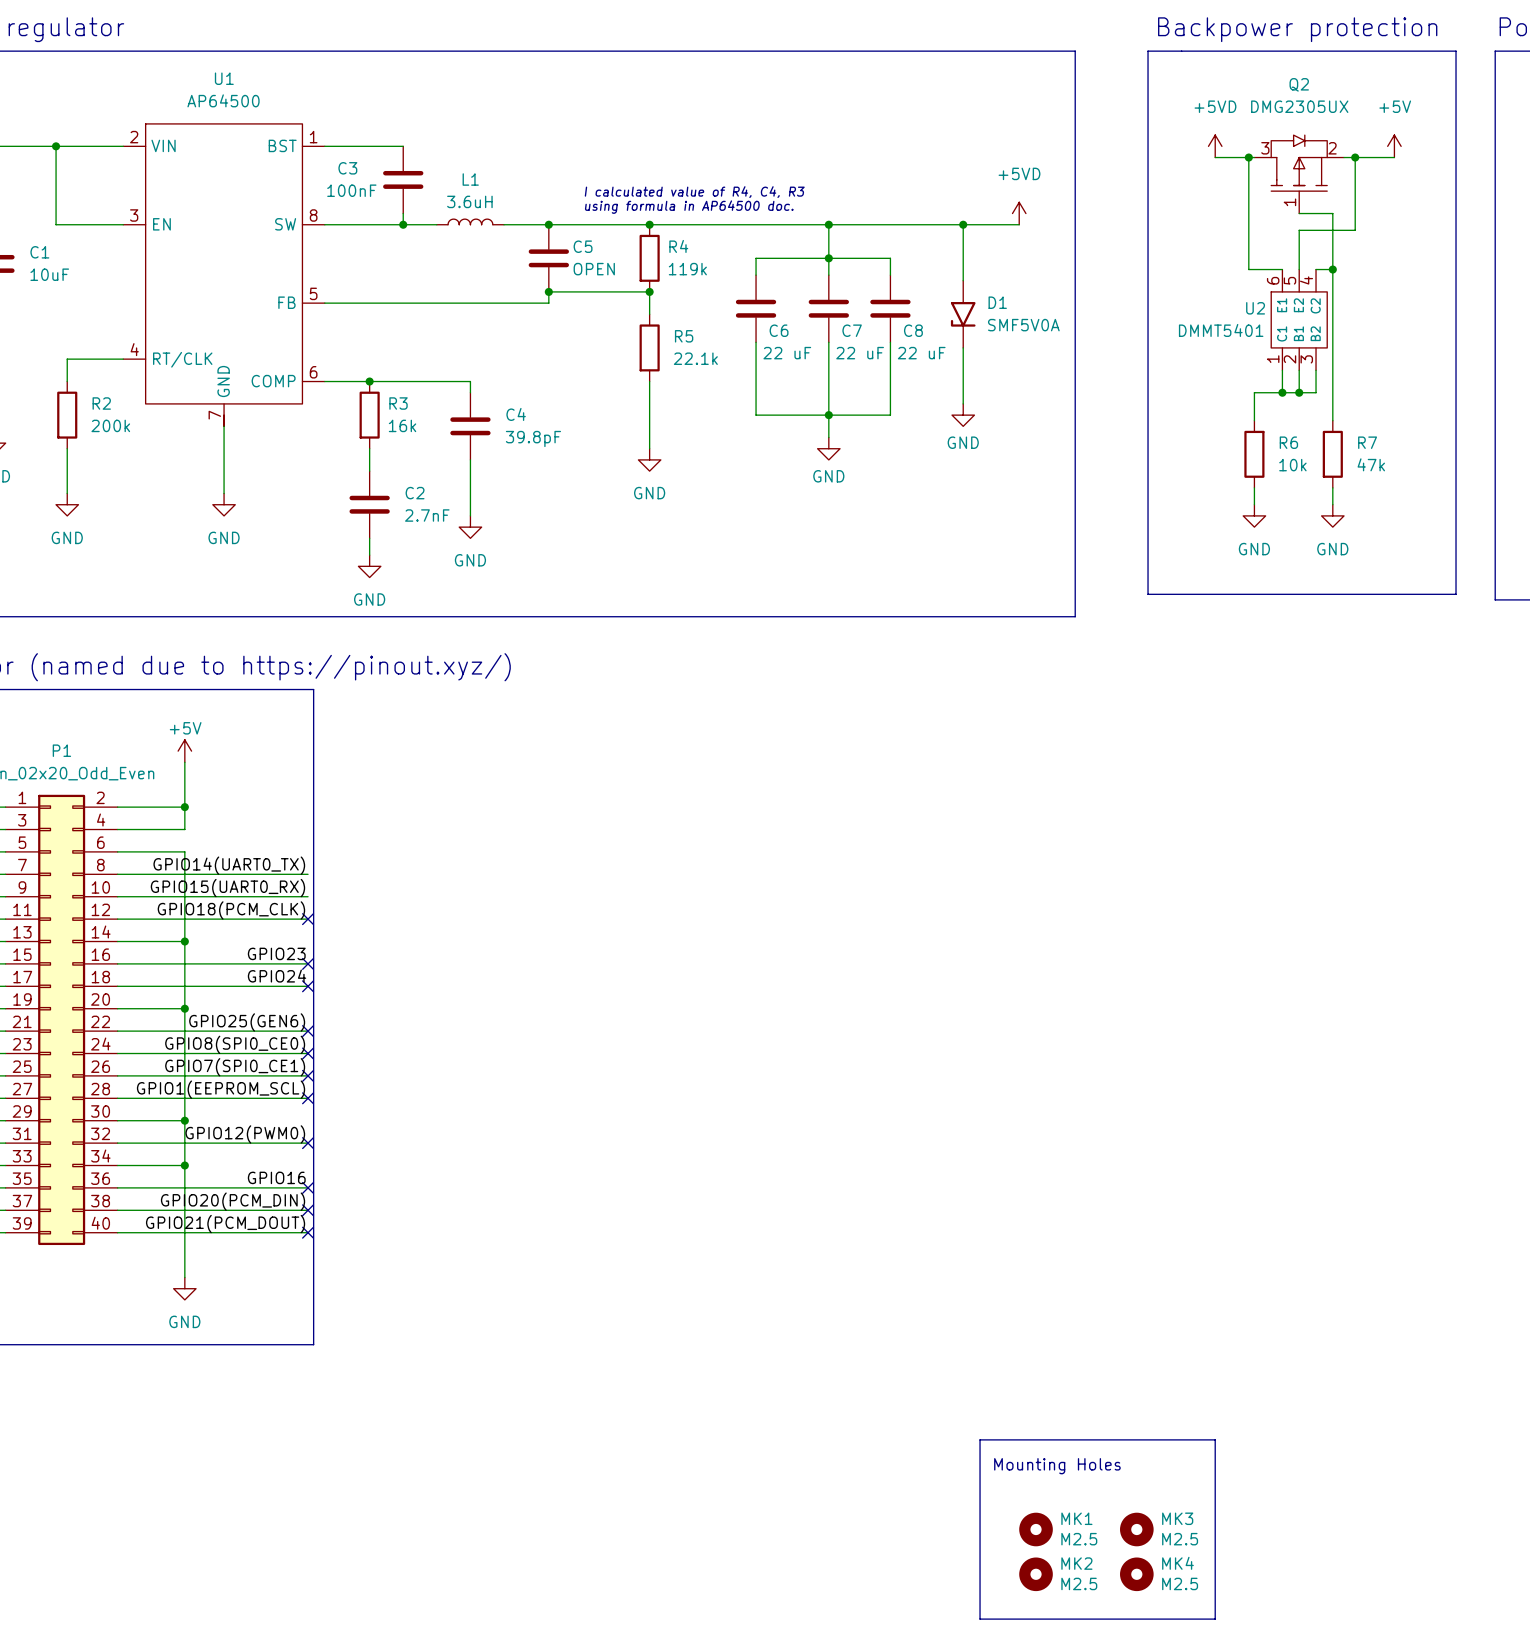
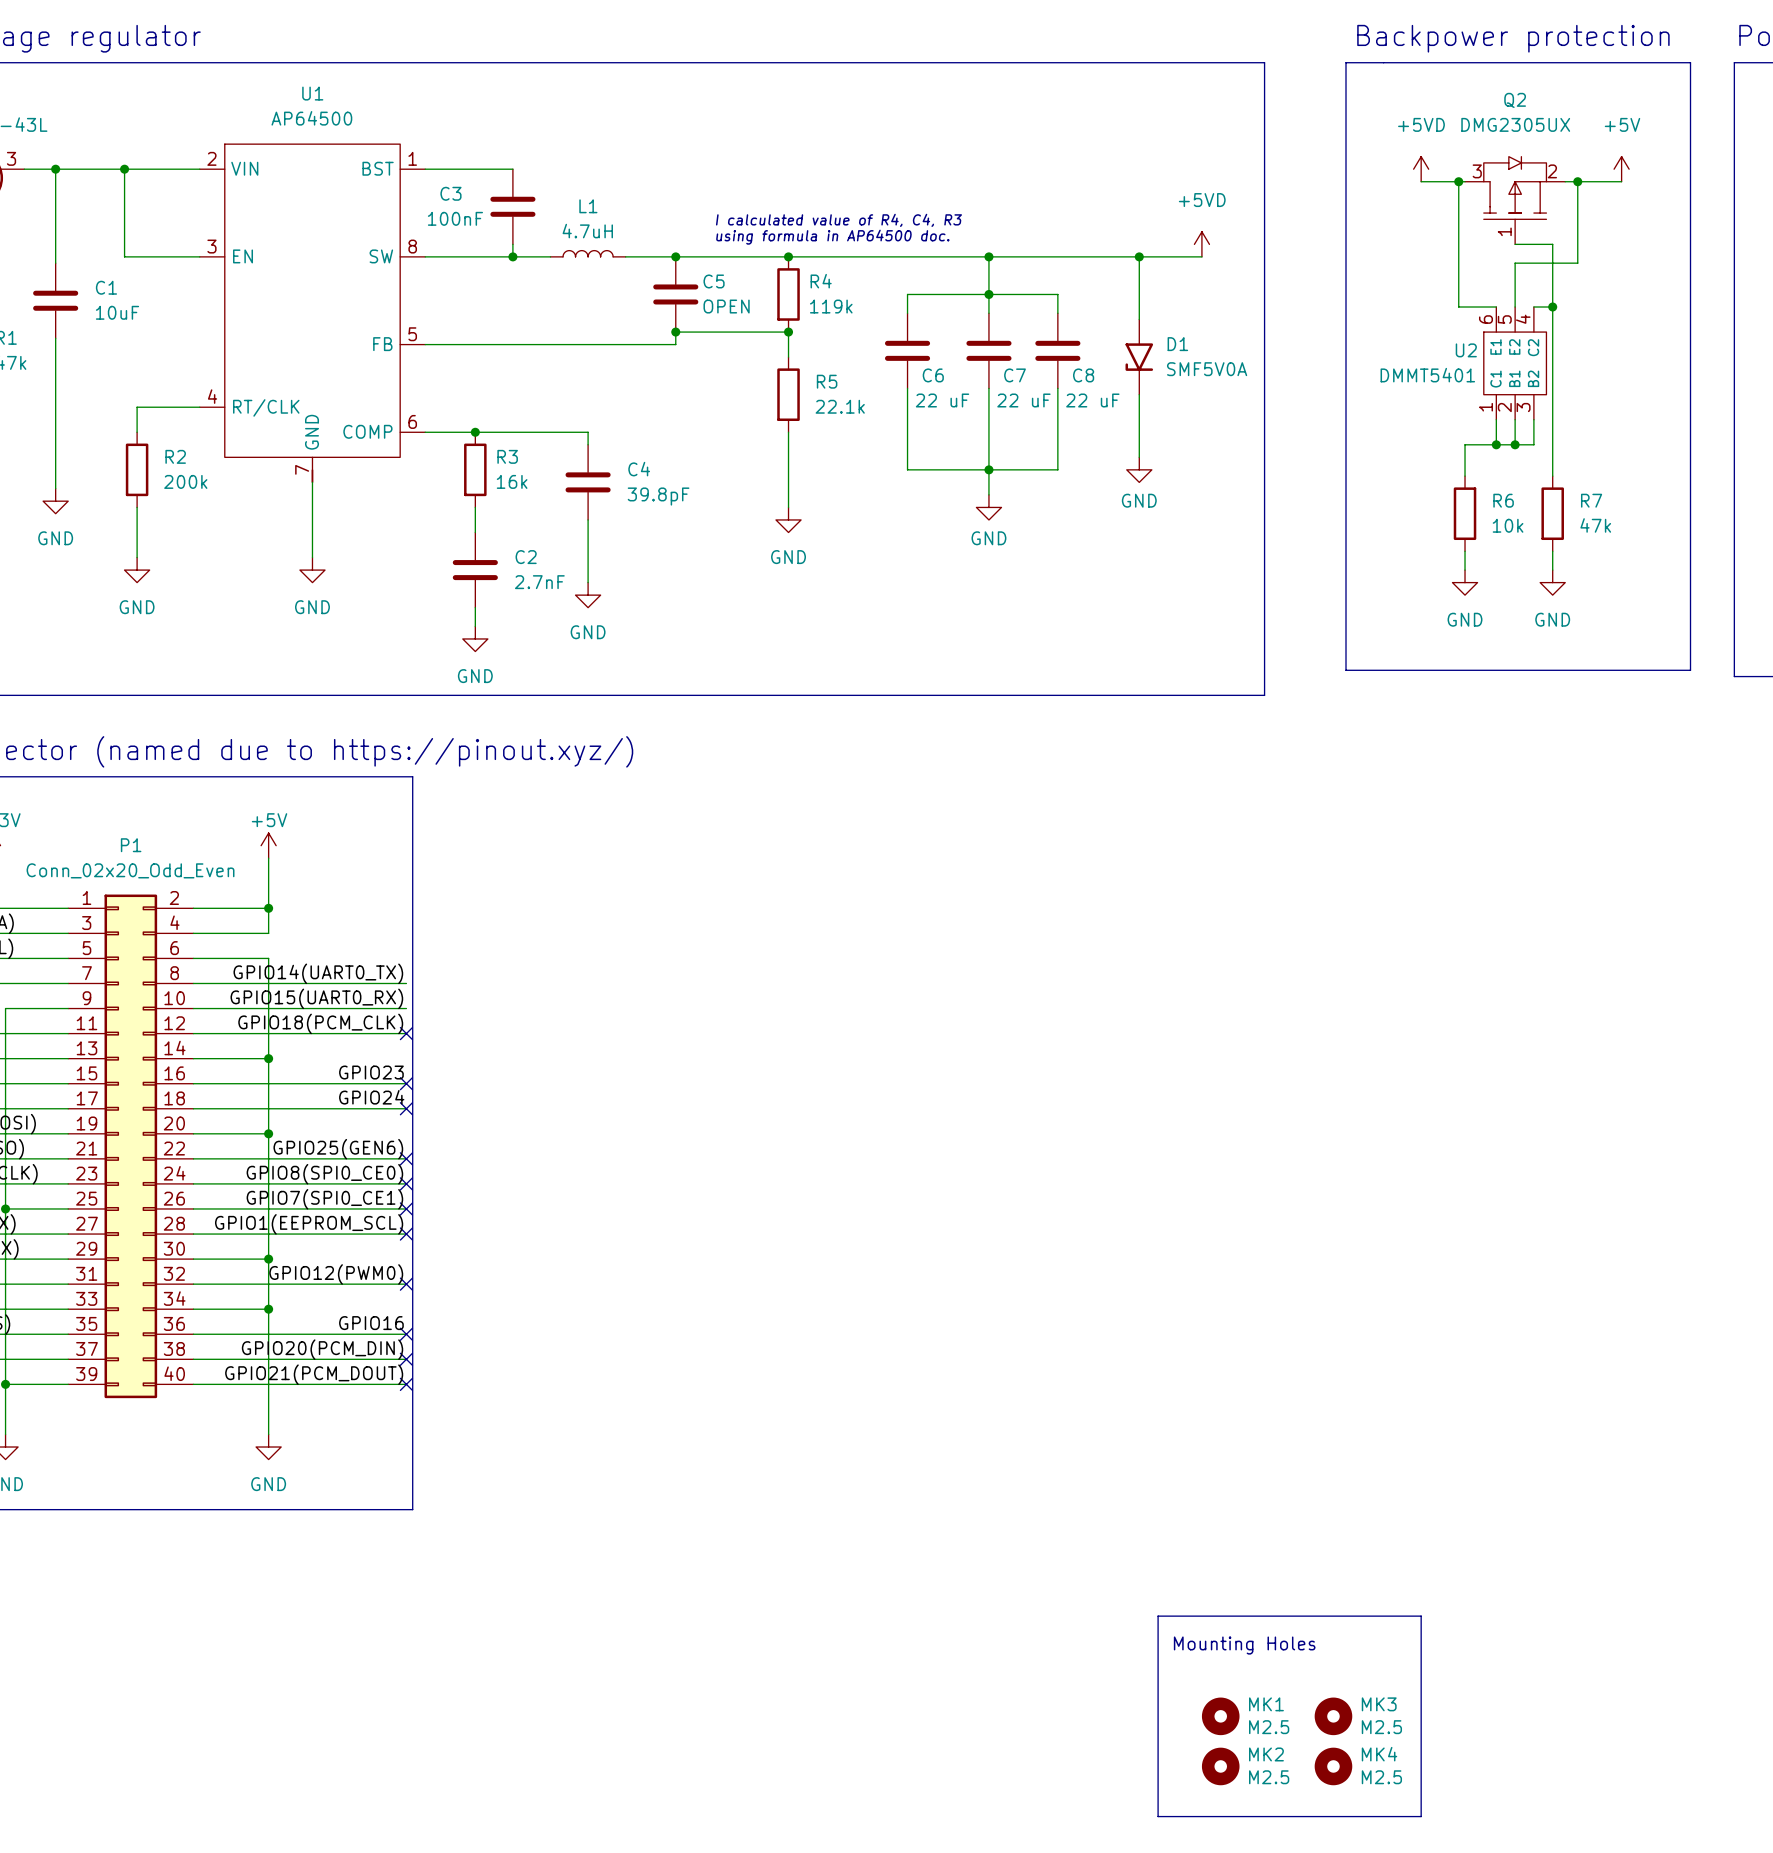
L1 value: 3.6uH (469, 201) -> 4.7uH (587, 231)

